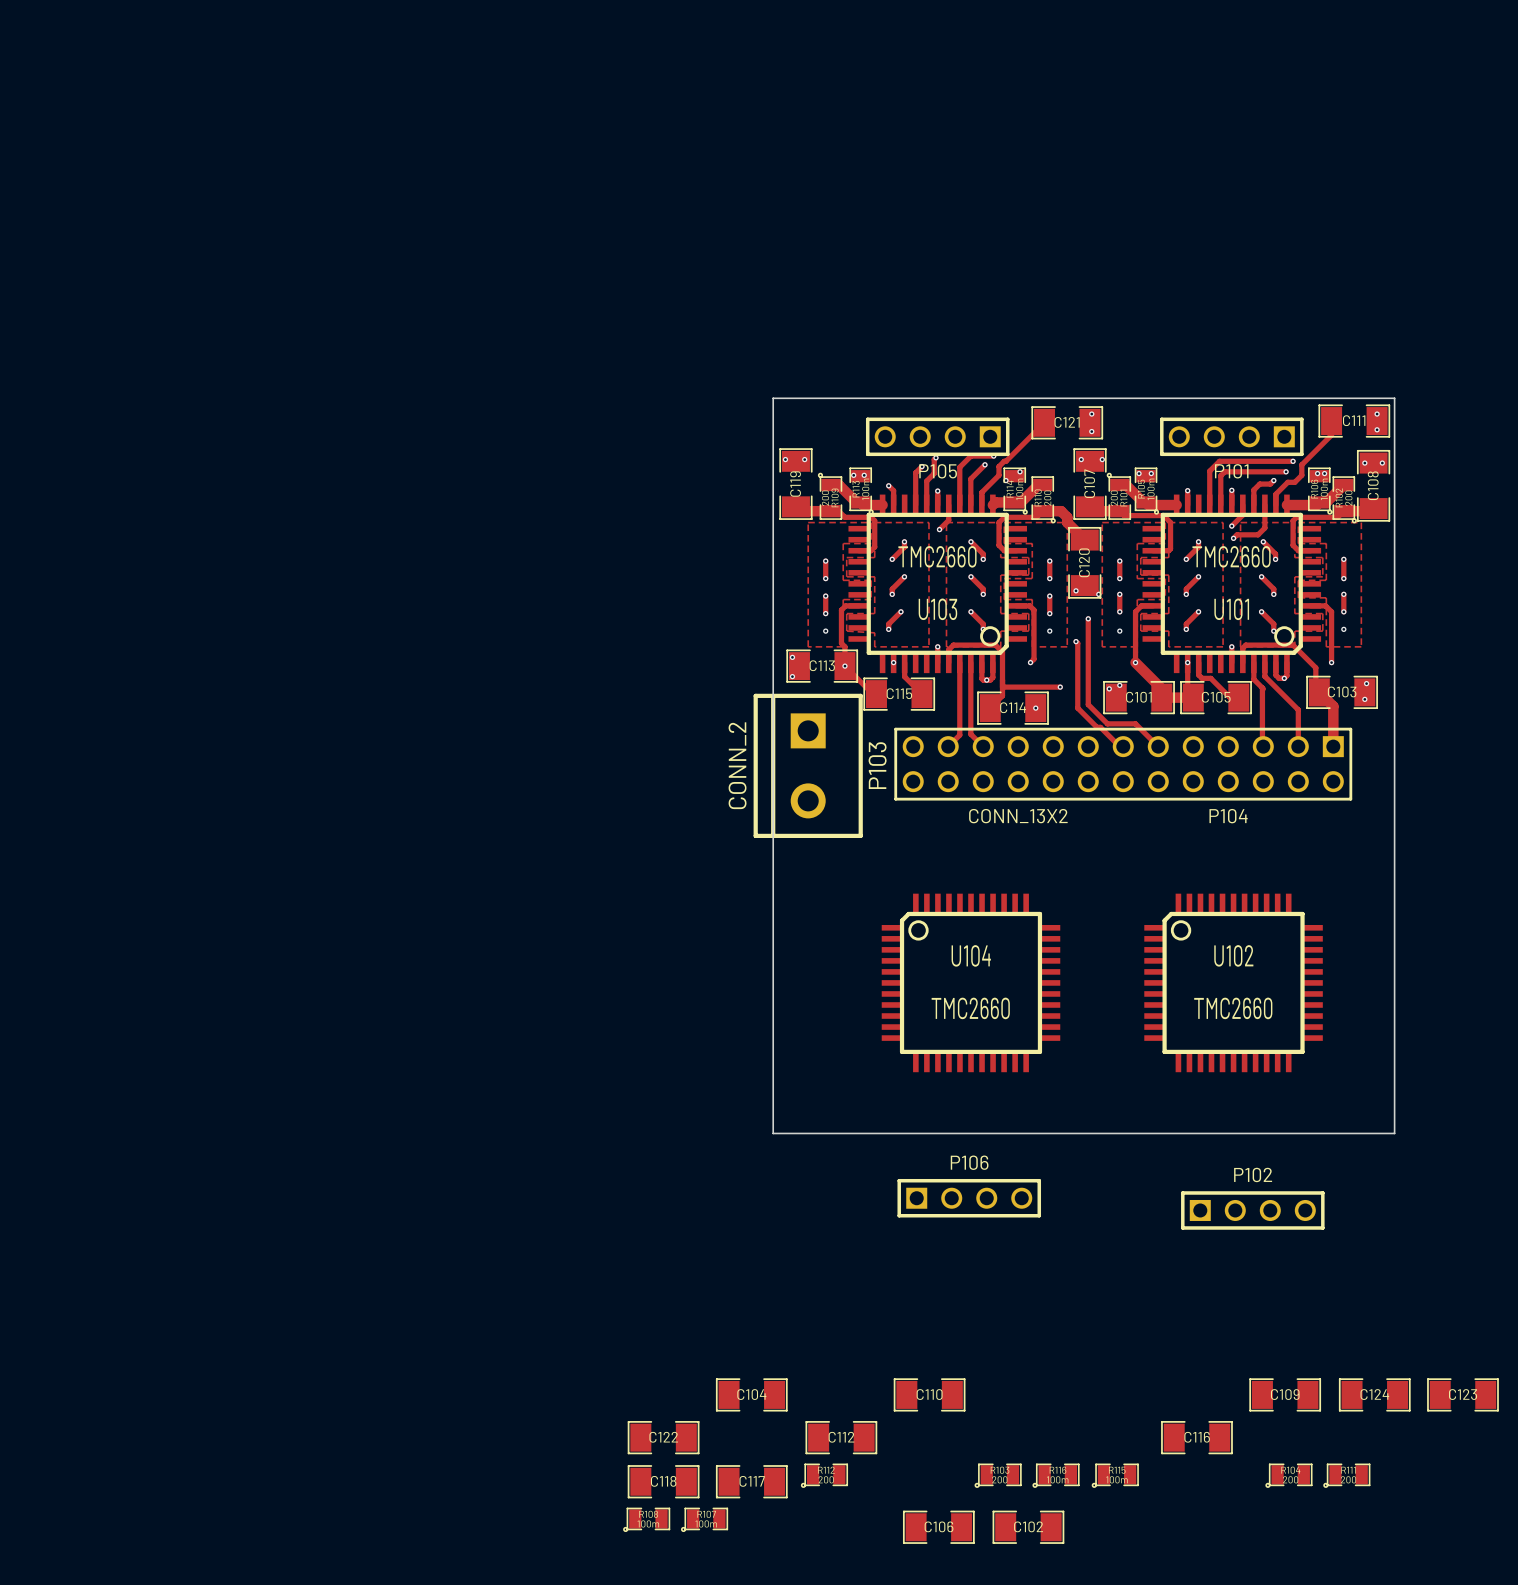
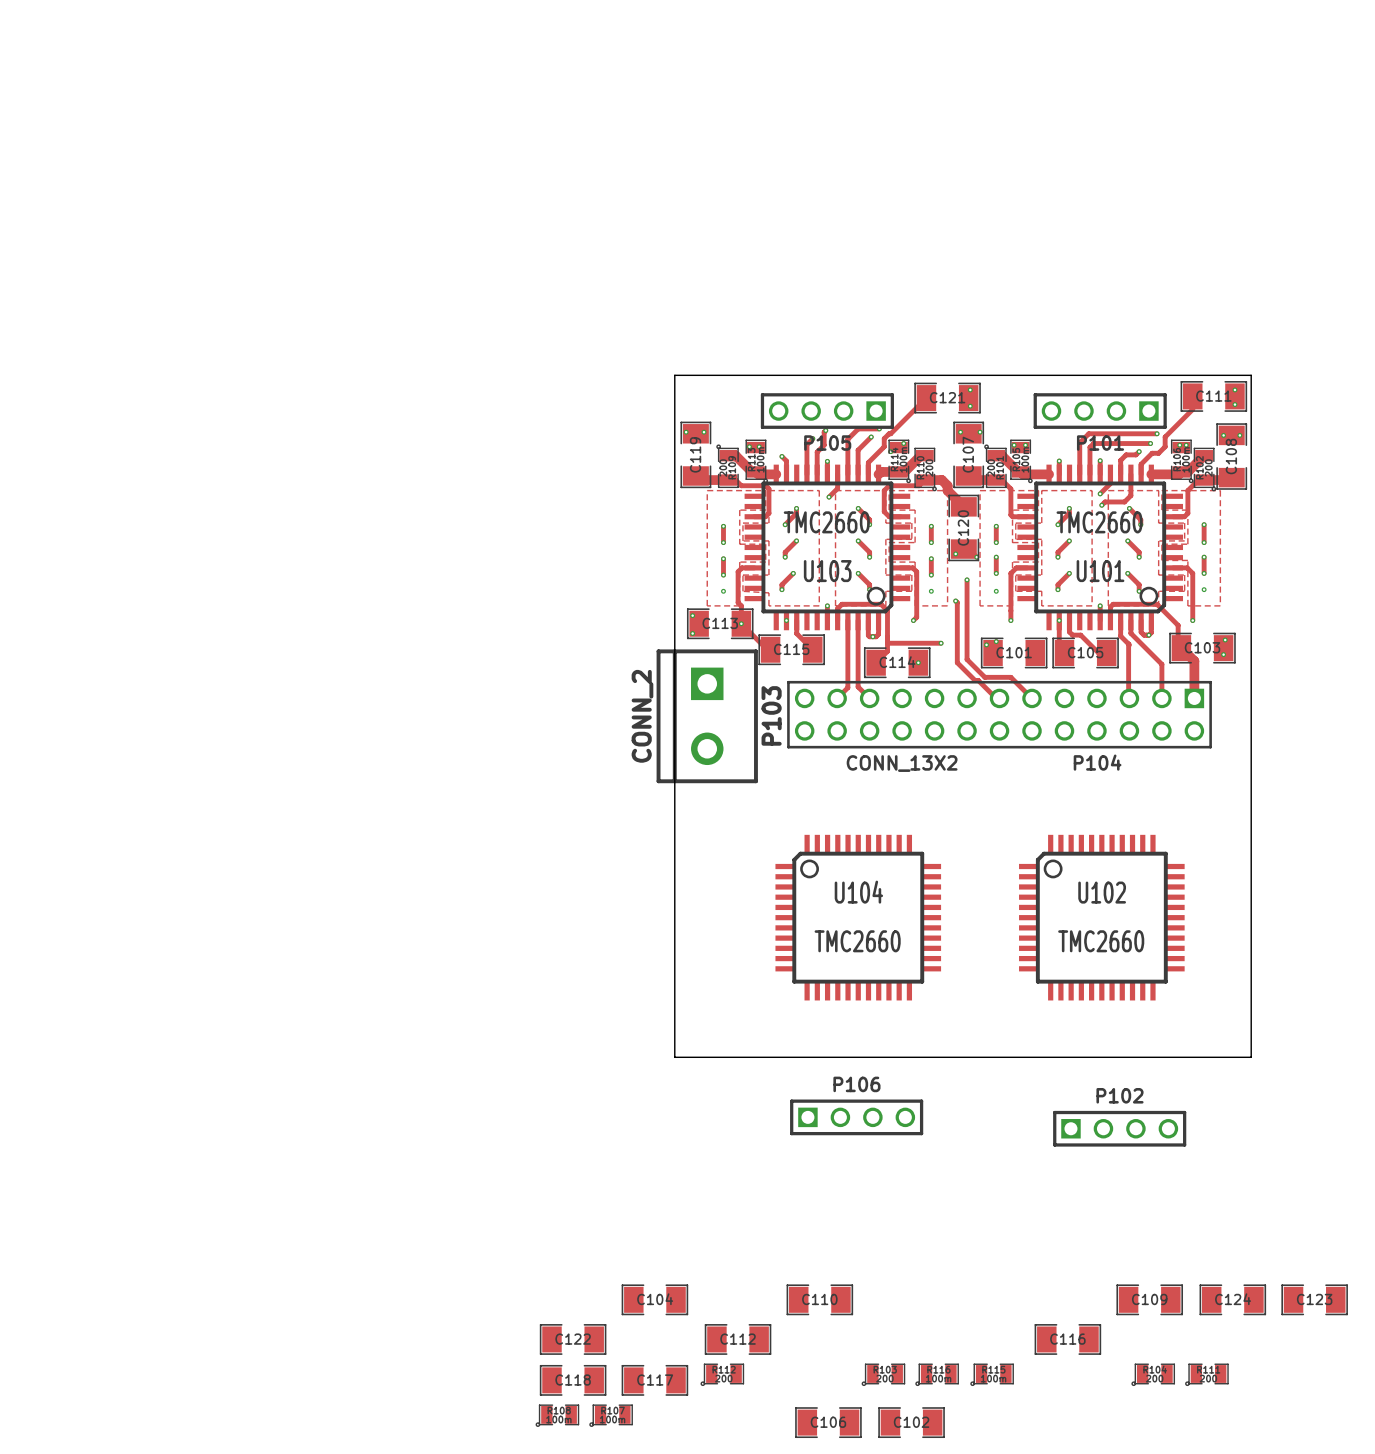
track: (1119, 511) (1124, 515) (1163, 515) (1170, 522) (1170, 548) (1168, 550) (1153, 550) -> (996, 480) (1001, 480) (1010, 488) (1010, 514) (1012, 516) (1027, 516)
track: (1343, 511) (1337, 517) (1296, 517) (1293, 520) (1293, 545) (1298, 550) (1310, 550) -> (1204, 480) (1198, 480) (1187, 490) (1187, 513) (1184, 516) (1173, 516)
track: (1135, 662) (1161, 688) (1161, 697) (1193, 697) -> none

